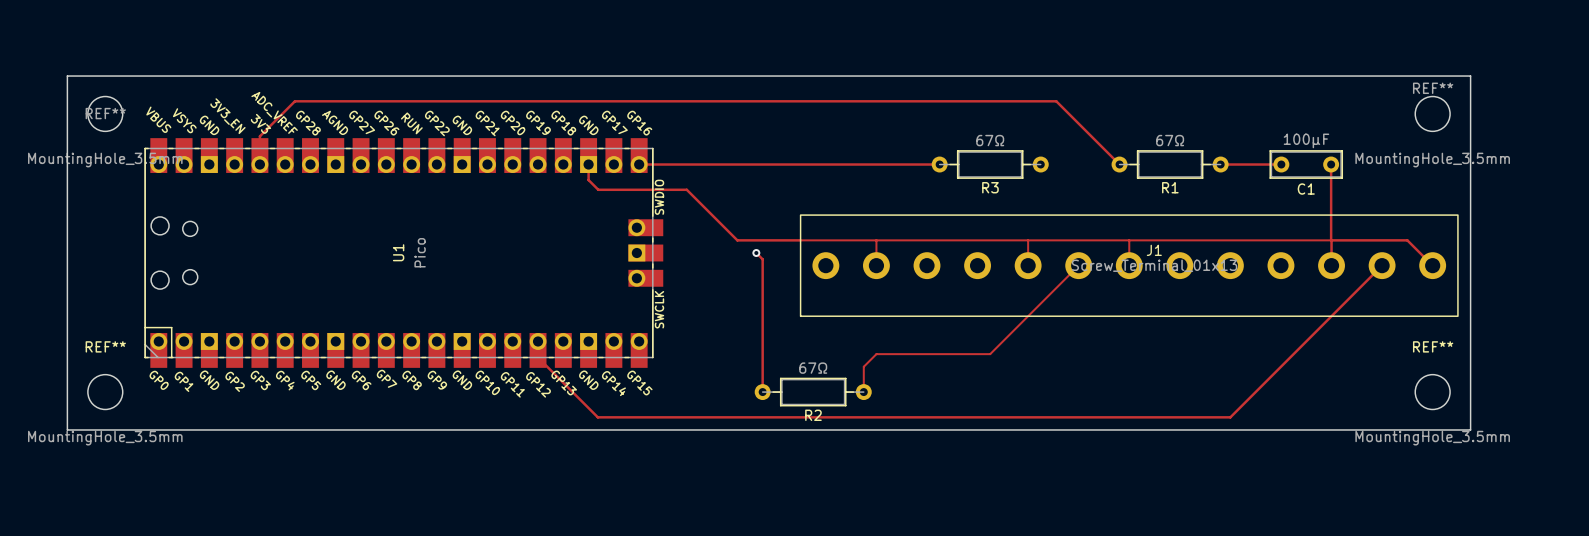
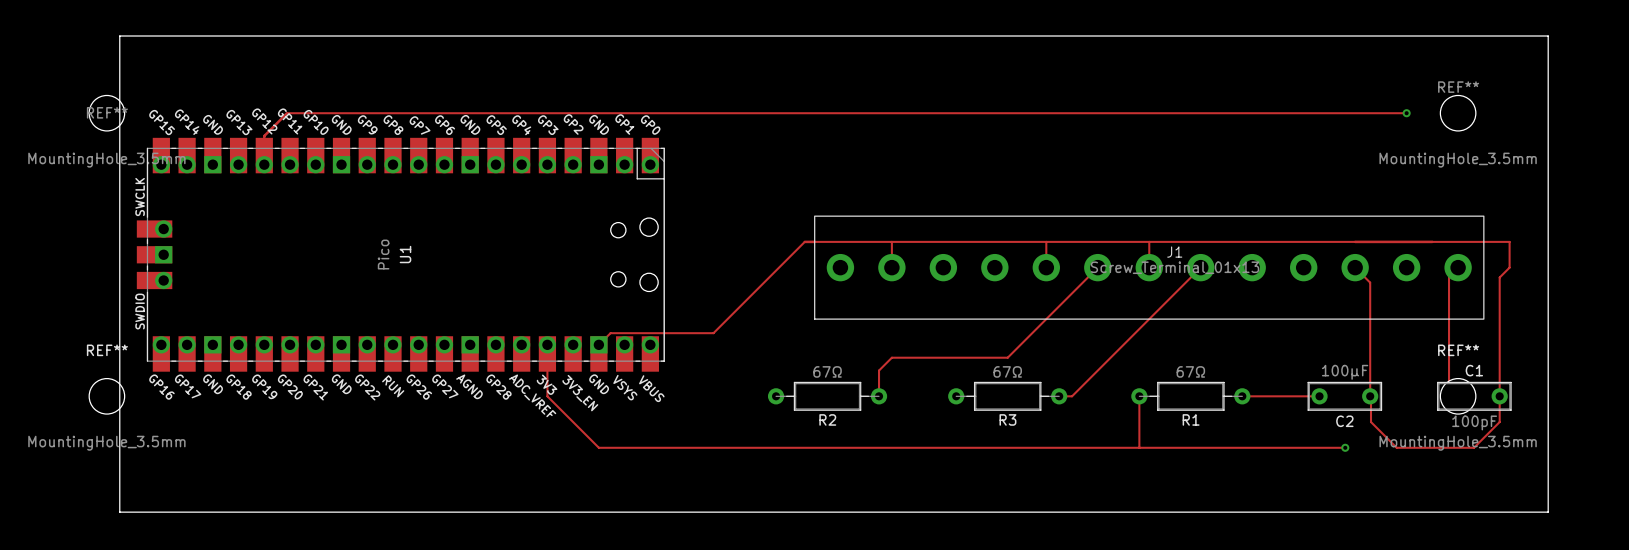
board edge: (67, 76) (1470, 76) (1470, 429) (67, 429) (67, 76) -> (119, 36) (119, 512) (1548, 512) (1548, 36) (119, 36)
track: (282, 113) (294, 101) (1056, 101) (1119, 164) -> (287, 113) (1406, 113)
via: none -> (1406, 113)
C1 value: 100μF (1306, 140) -> 100pF (1474, 422)
track: (588, 164) (588, 180) (598, 189) (686, 189) (737, 240) (790, 240) -> (598, 344) (610, 333) (713, 333) (804, 241)
track: (639, 164) (939, 164) -> none
R3 position: (990, 164) -> (1007, 396)
R1 position: (1170, 164) -> (1190, 396)
track: (1220, 164) (1281, 164) -> none
C1 position: (1306, 164) -> (1474, 396)
track: (1331, 164) (1331, 265) -> none
C1 name position: C1 (1306, 189) -> C1 (1474, 370)
track: (1407, 240) (1432, 265) -> (1432, 241) (1509, 241) (1509, 267) (1499, 277) (1499, 422) (1473, 447) (1396, 447) (1371, 422) (1370, 282) (1355, 267)
U1 rotation: 0° (403, 253) -> 180° (400, 254)
track: (756, 253) (762, 259) (762, 392) -> none
via: (756, 253) -> none
track: none -> (1200, 267) (1072, 396) (1059, 396)
track: (1382, 265) (1230, 417) (597, 417) (538, 357) -> (1345, 447) (598, 447) (547, 396) (547, 361)
track: none -> (1449, 276) (1449, 396)
track: none -> (1139, 396) (1139, 447)
track: none -> (1242, 396) (1319, 396)
C2: none -> 100μF (1344, 396)
via: none -> (1345, 447)

